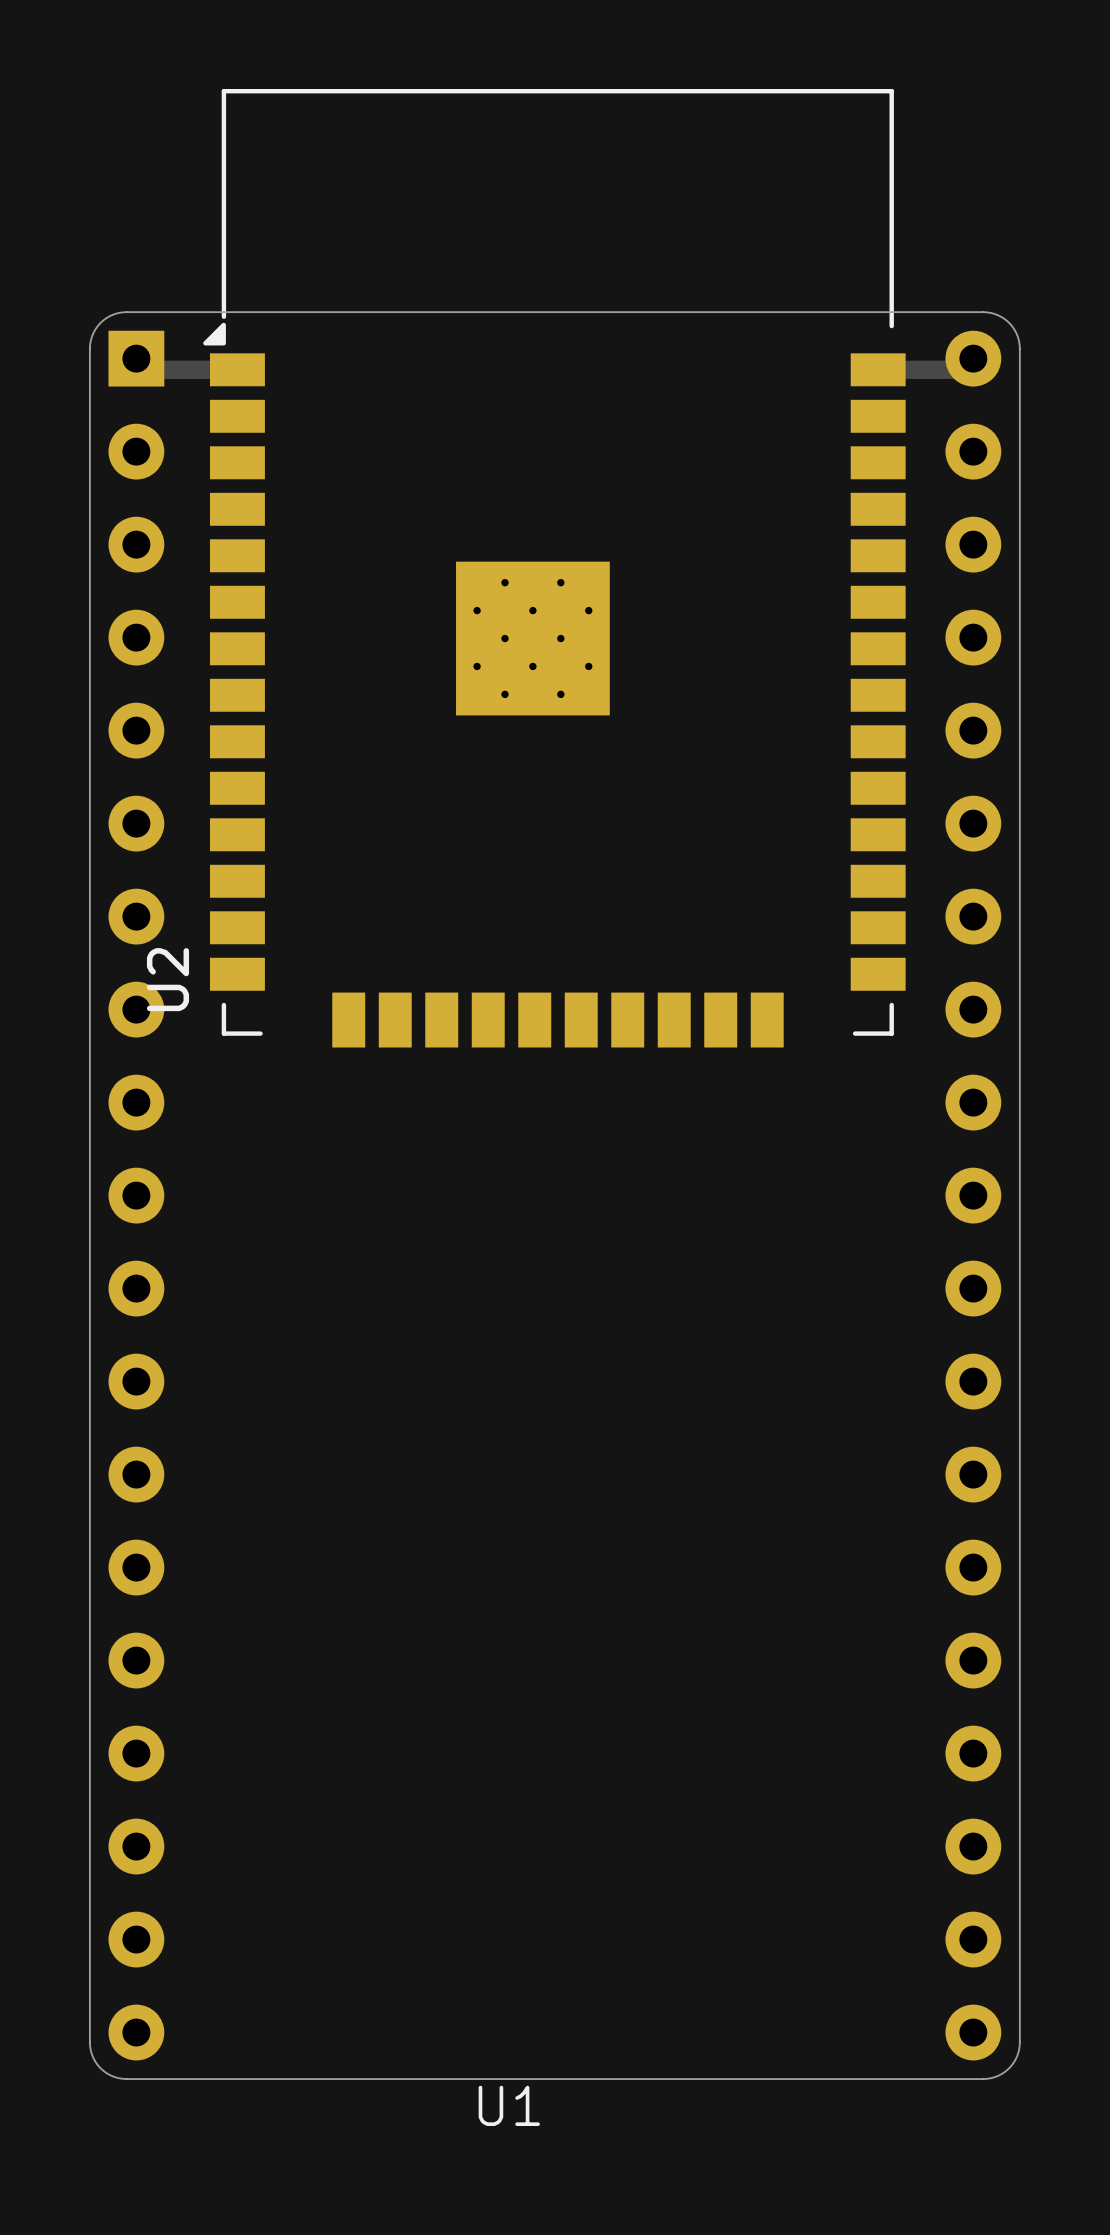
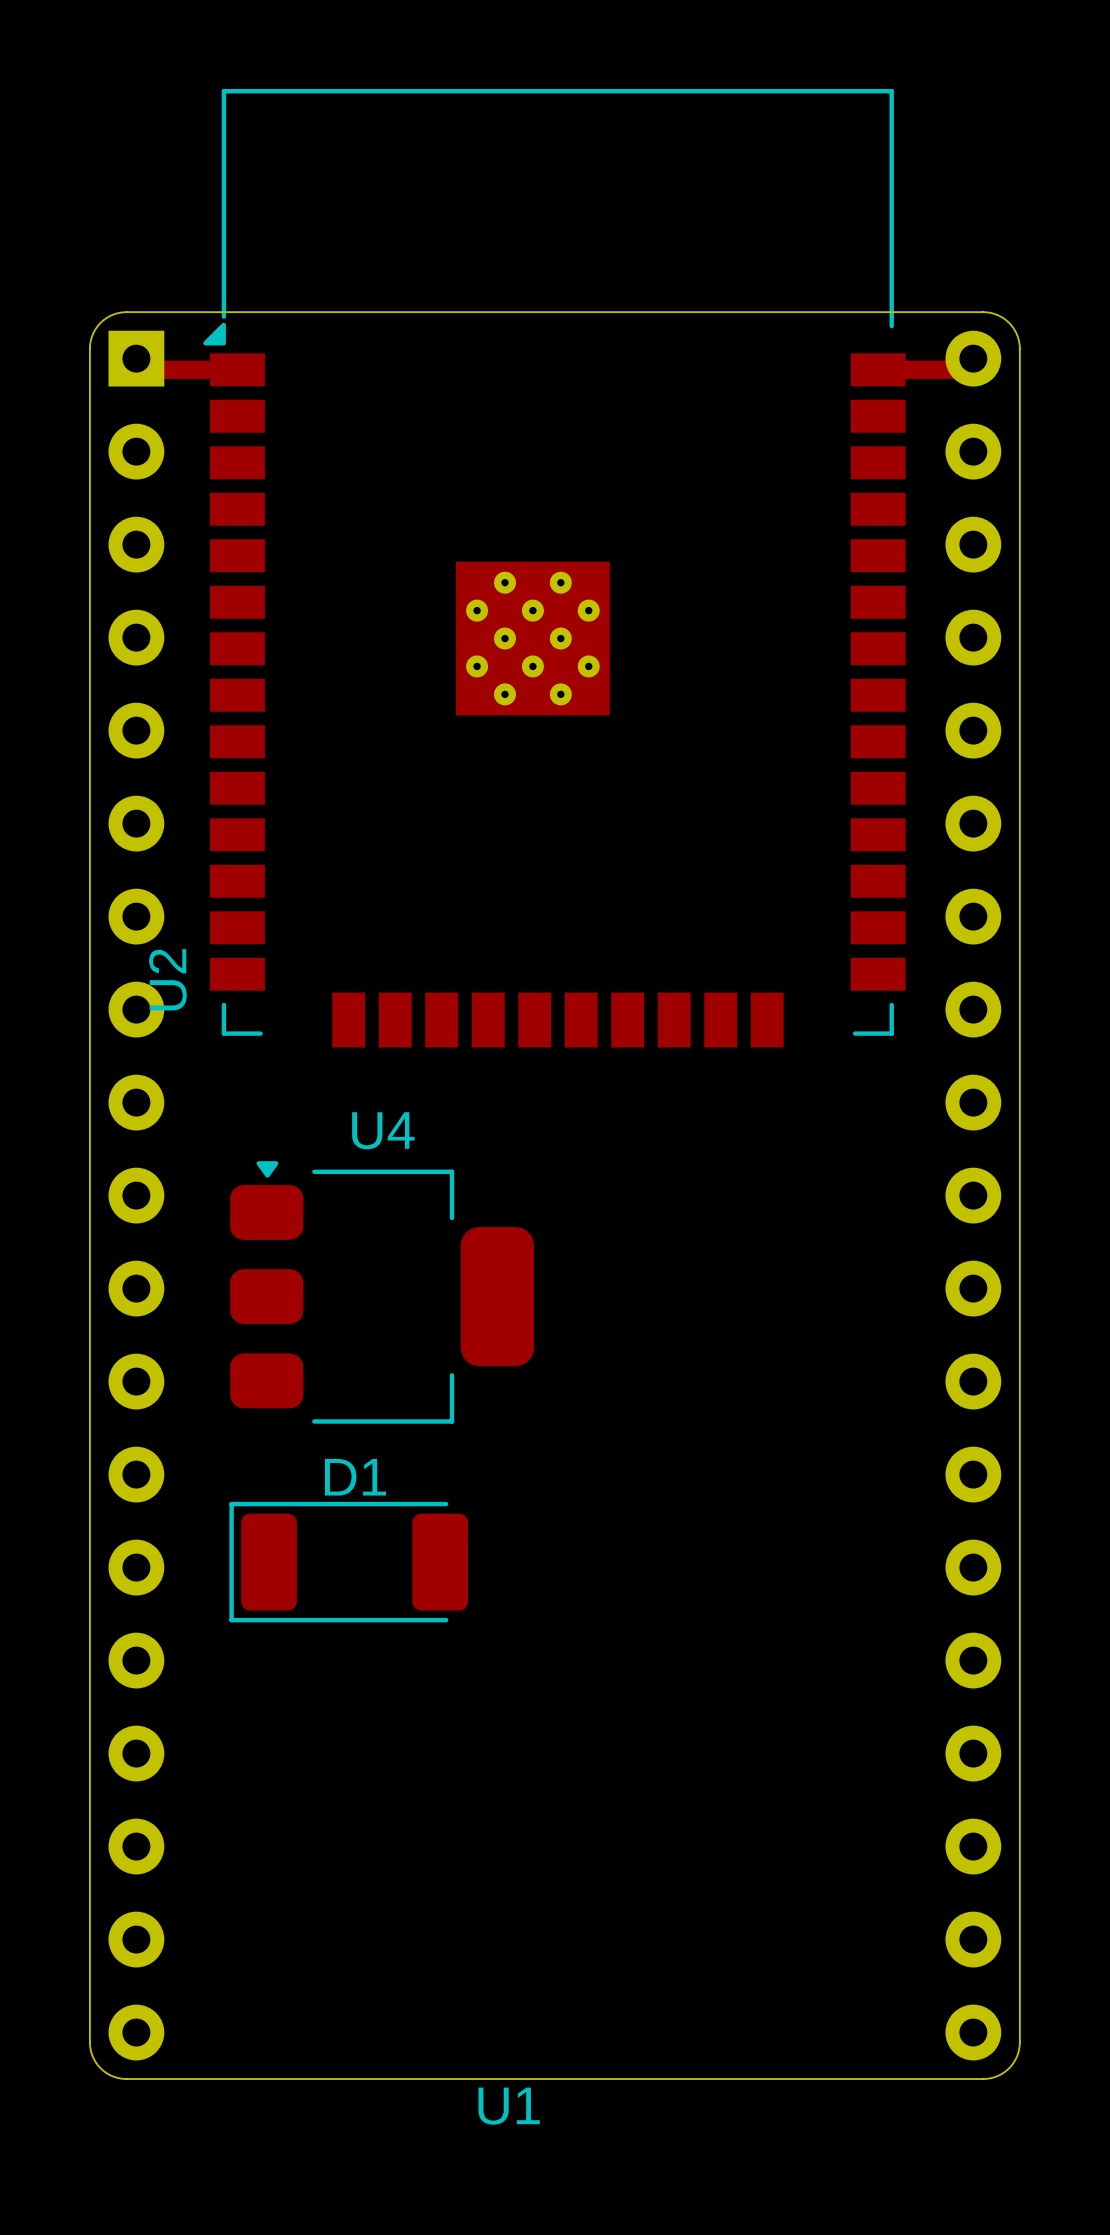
U4: none -> (382, 1292)
D1: none -> (348, 1562)

